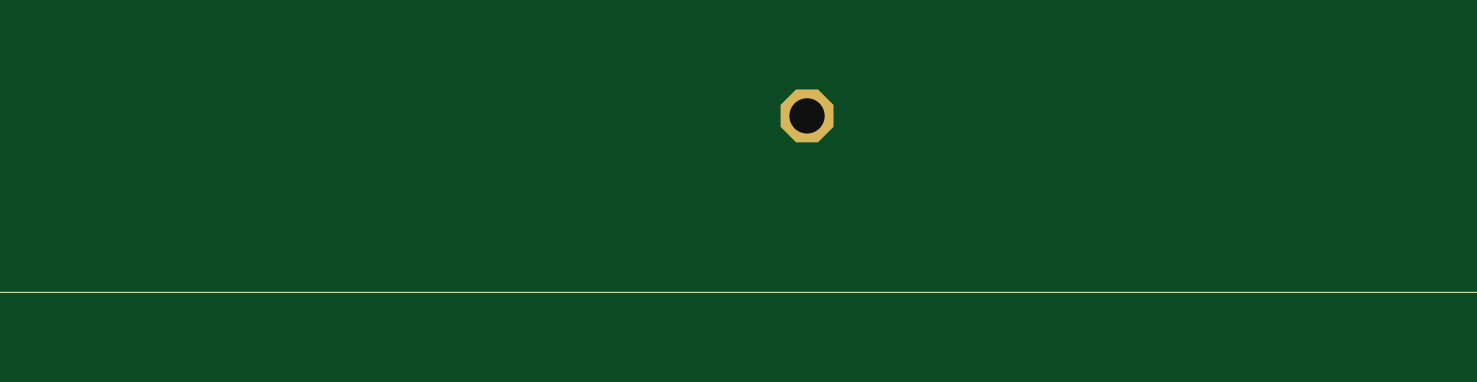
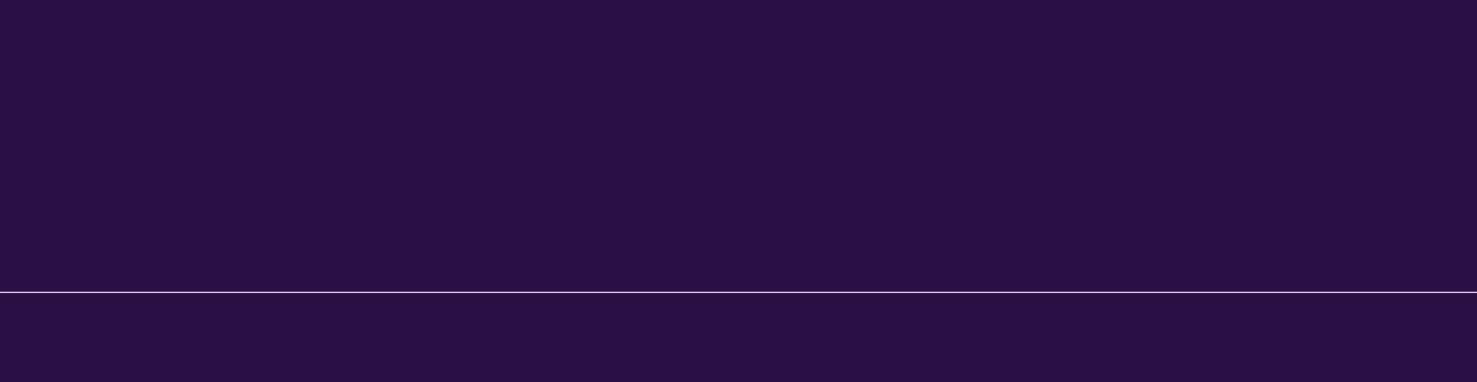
part: (807, 115) -> none

